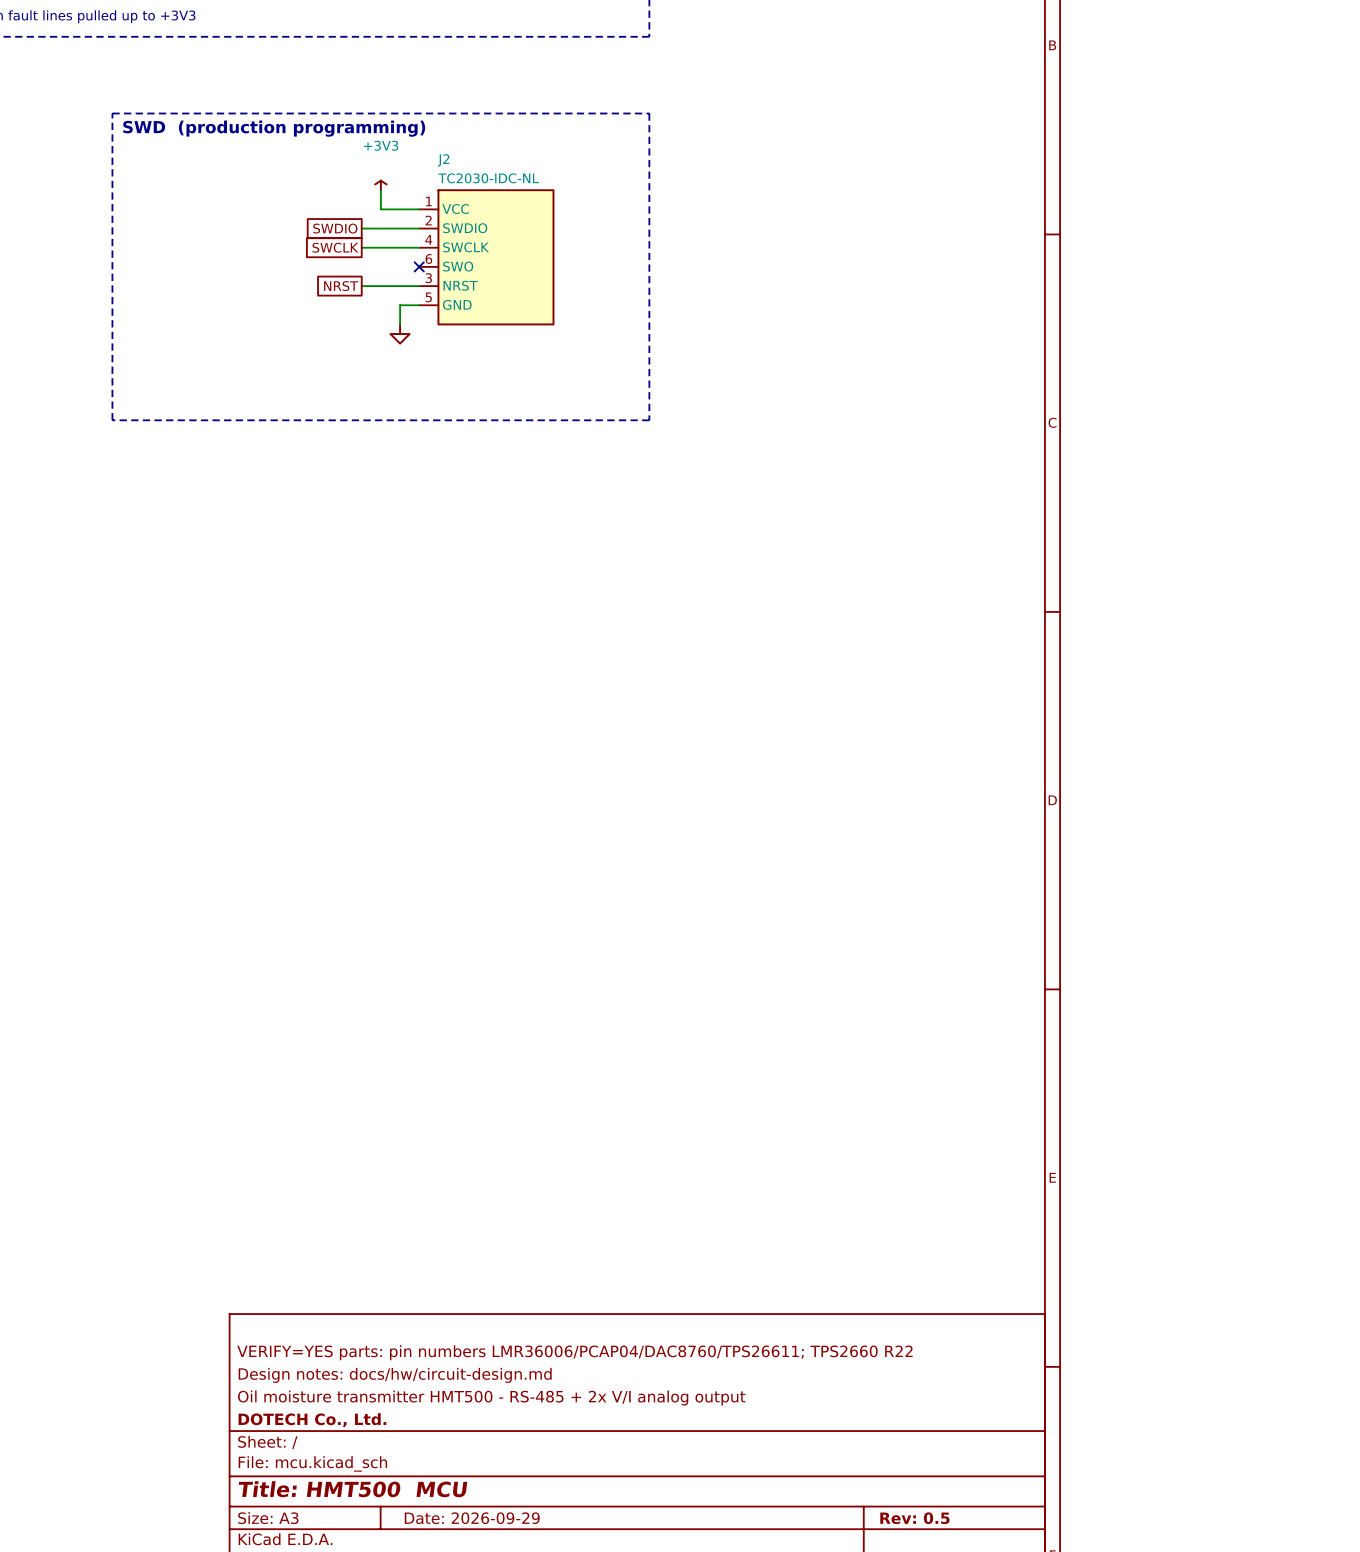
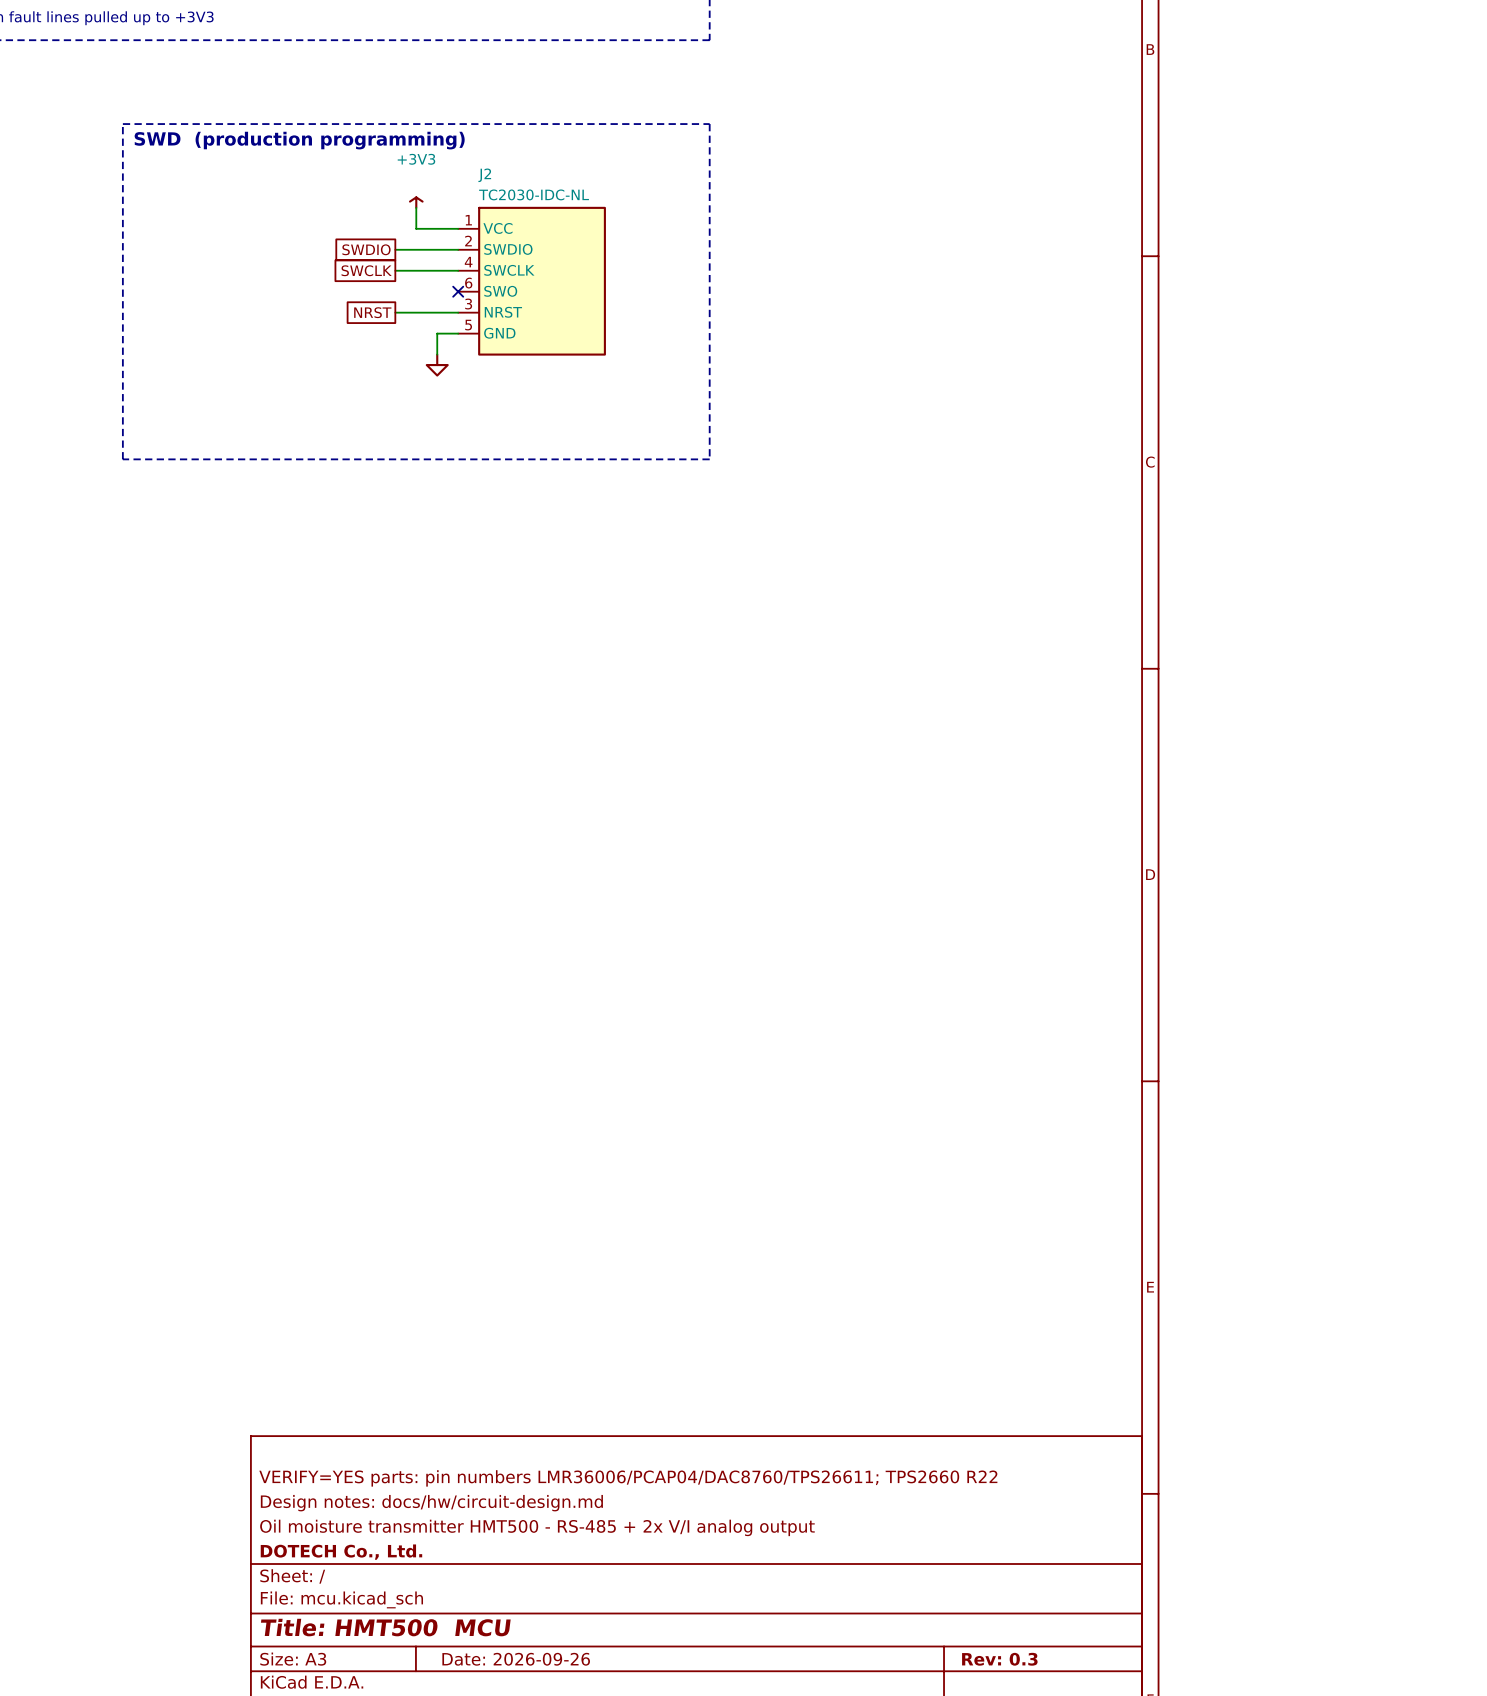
title block: Date: 2026-09-29 (472, 1518) -> Date: 2026-09-26 (516, 1659)
title block: Rev: 0.5 (914, 1518) -> Rev: 0.3 (999, 1659)

